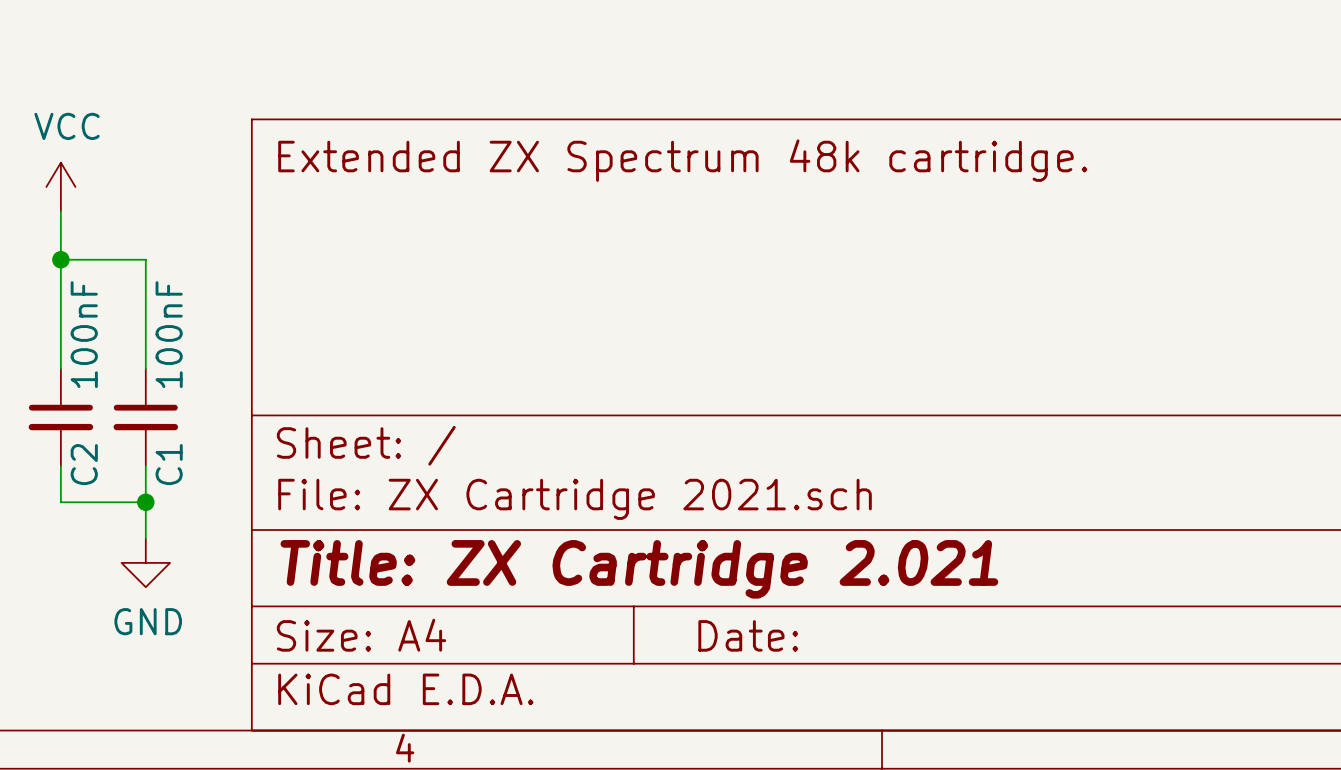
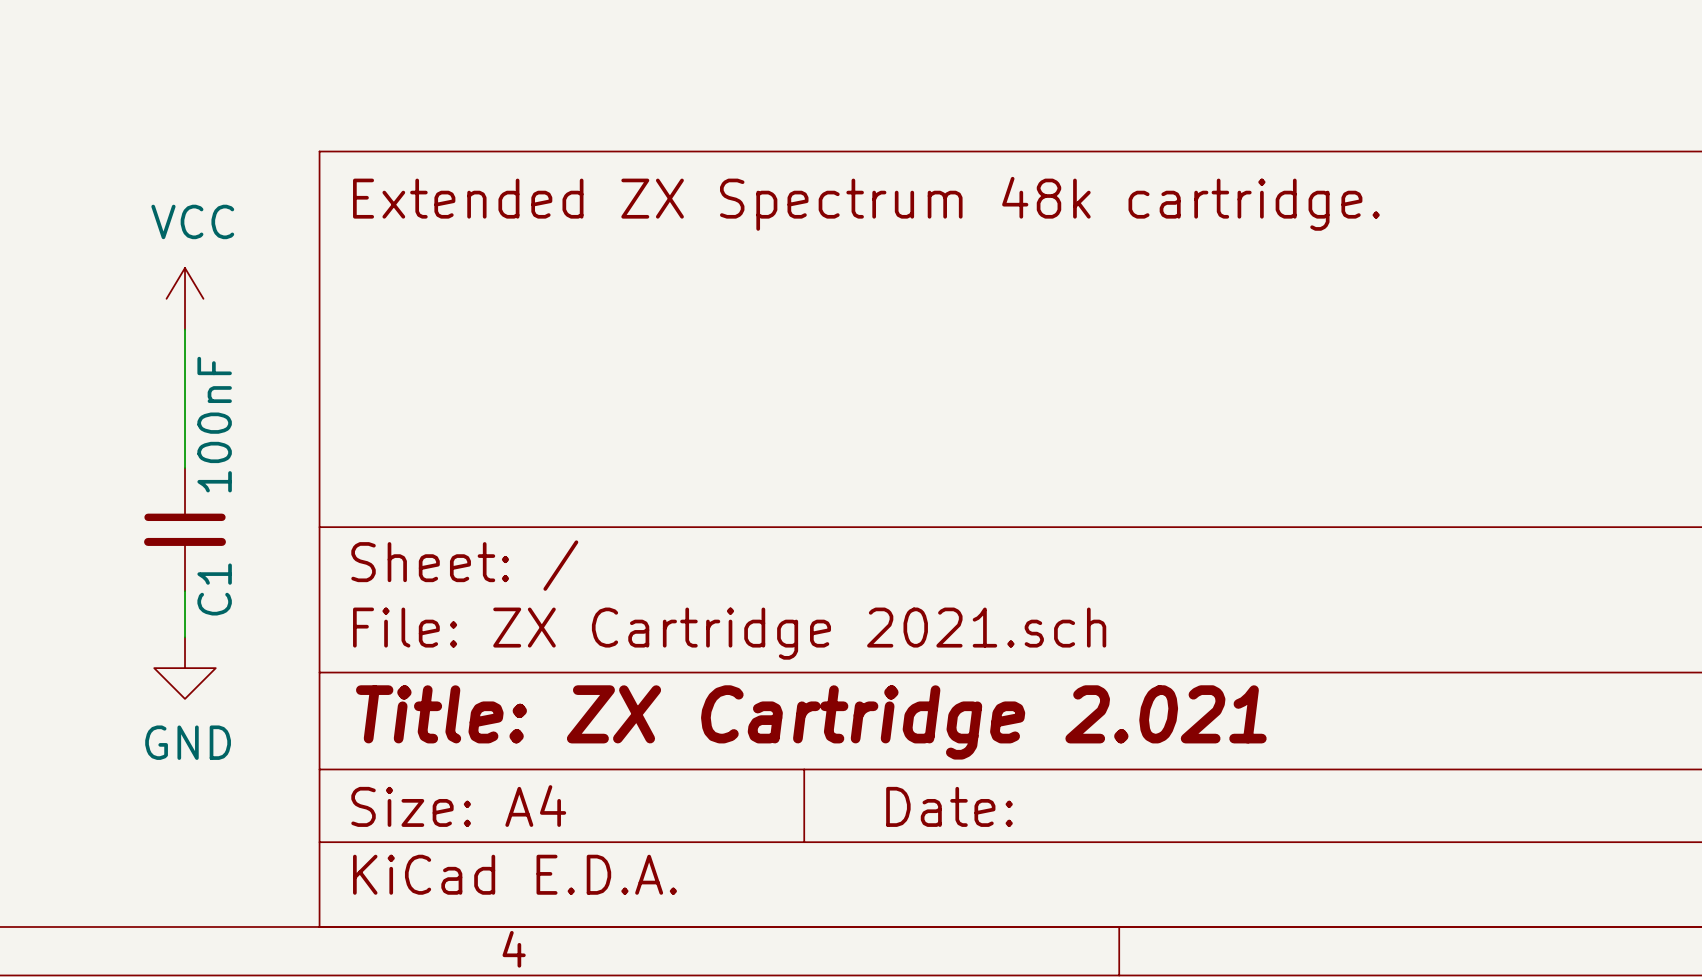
power symbol position: VCC (60, 186) -> VCC (185, 298)
wire: (60, 211) (60, 368) -> none
wire: (60, 259) (145, 259) -> none
junction: (60, 259) -> none
C2: 100nF (60, 417) -> none
wire: (60, 465) (60, 502) (145, 502) (145, 538) -> none
junction: (145, 502) -> none
power symbol position: GND (145, 562) -> GND (185, 668)

